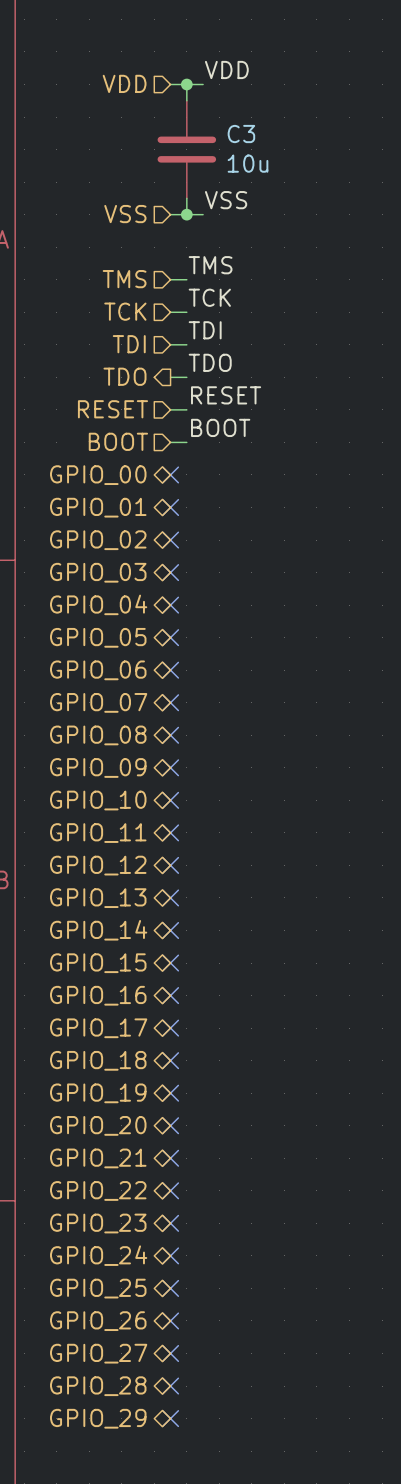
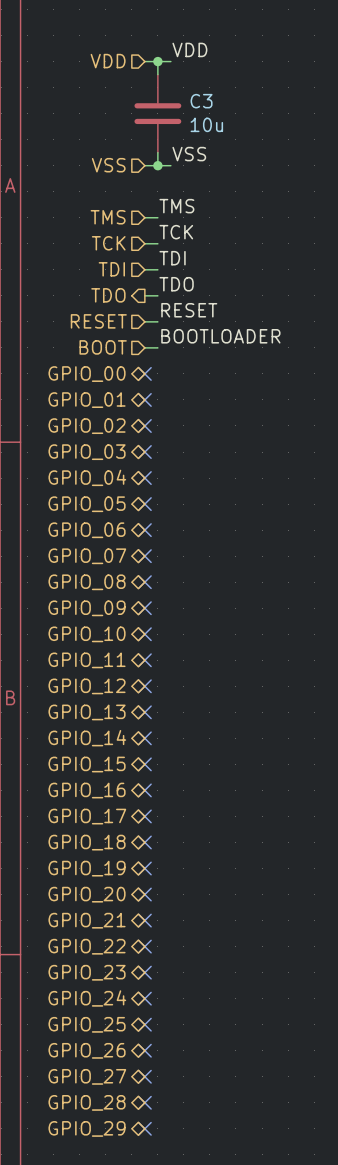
label: BOOT (220, 427) -> BOOTLOADER (220, 336)

